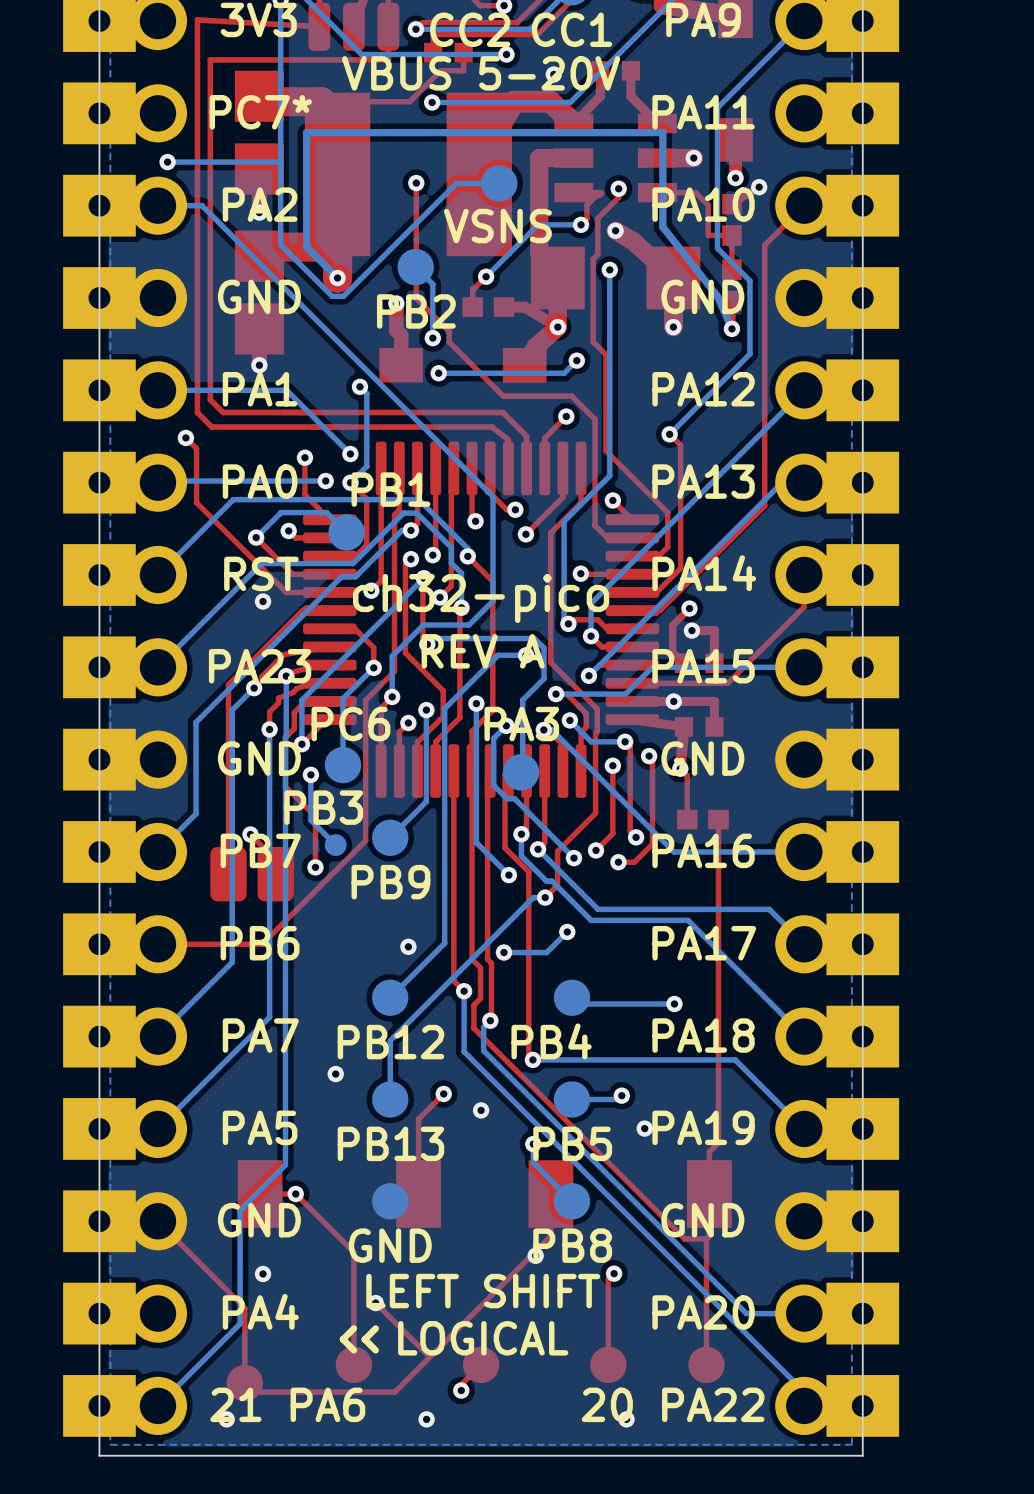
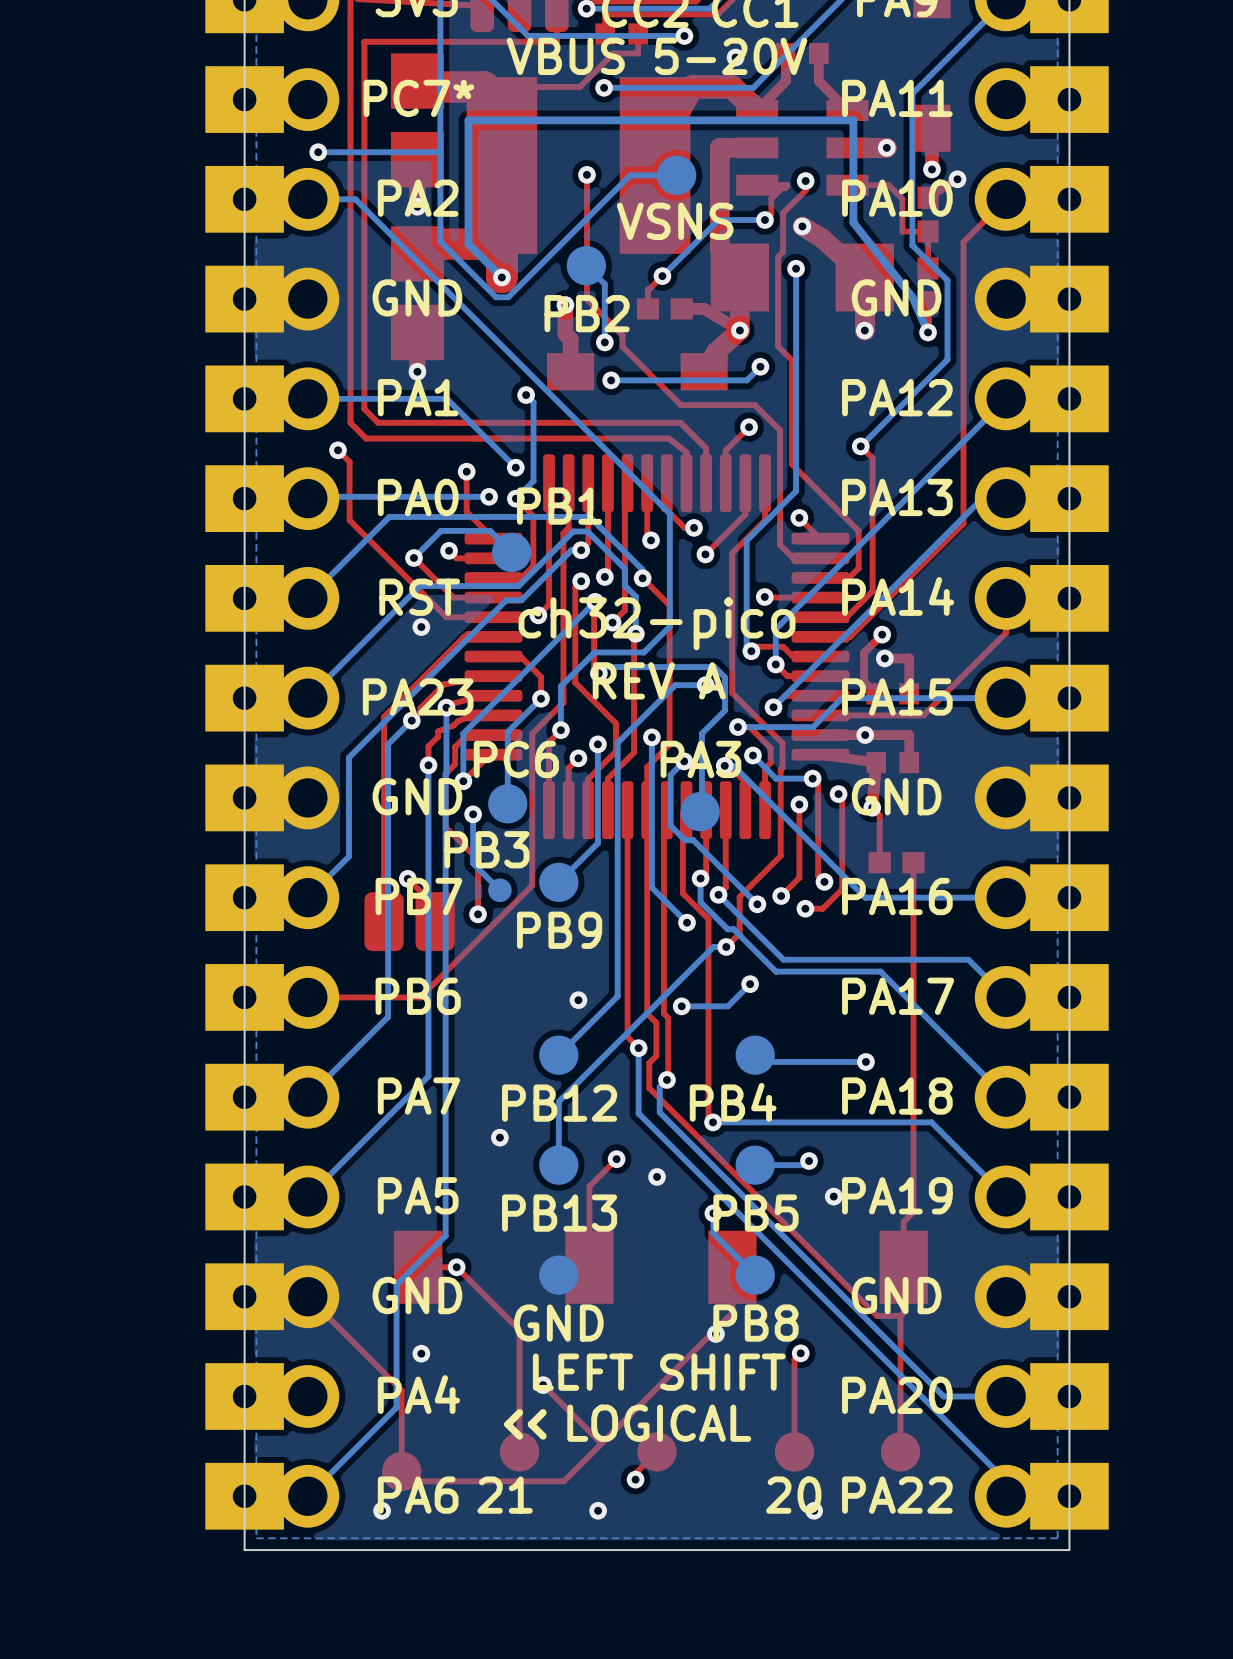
text: 21 PA6 (287, 1404) -> PA6 (418, 1495)
text: none -> 21 (505, 1495)
text: none -> 20 (793, 1495)
text: 20 PA22 (673, 1404) -> PA22 (897, 1495)

